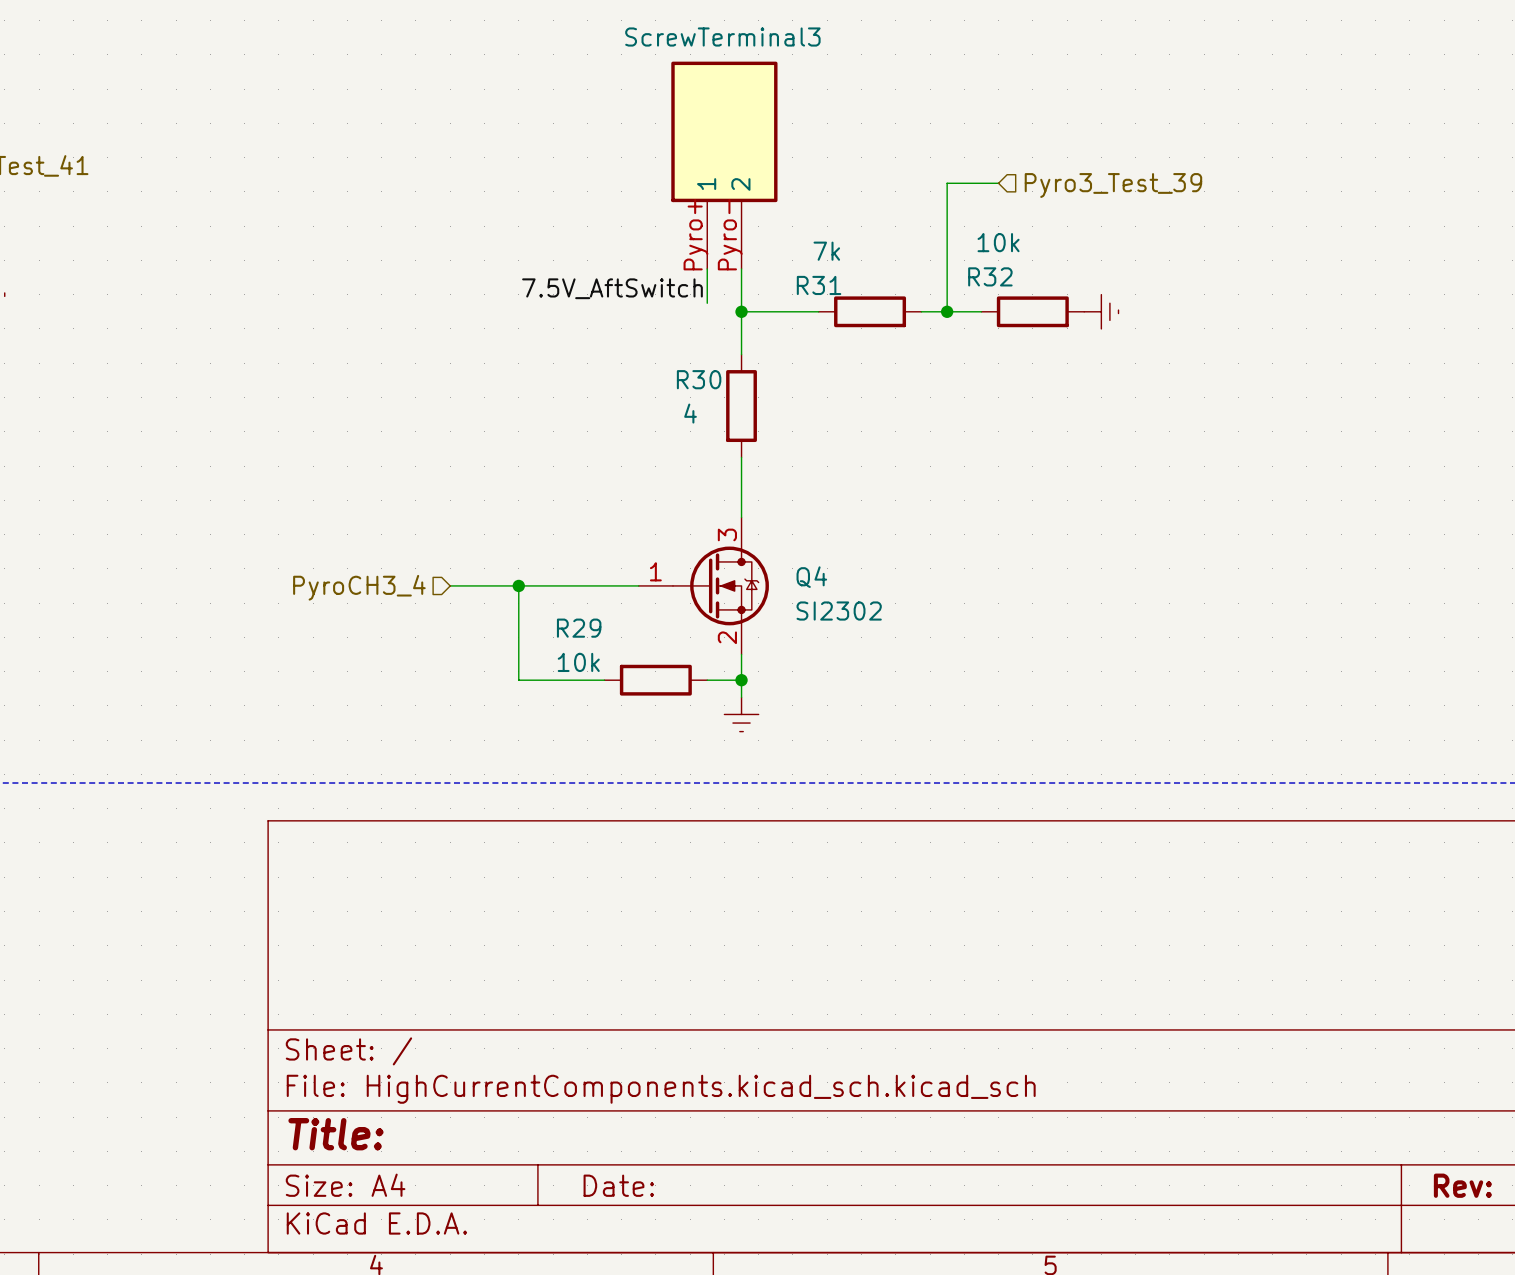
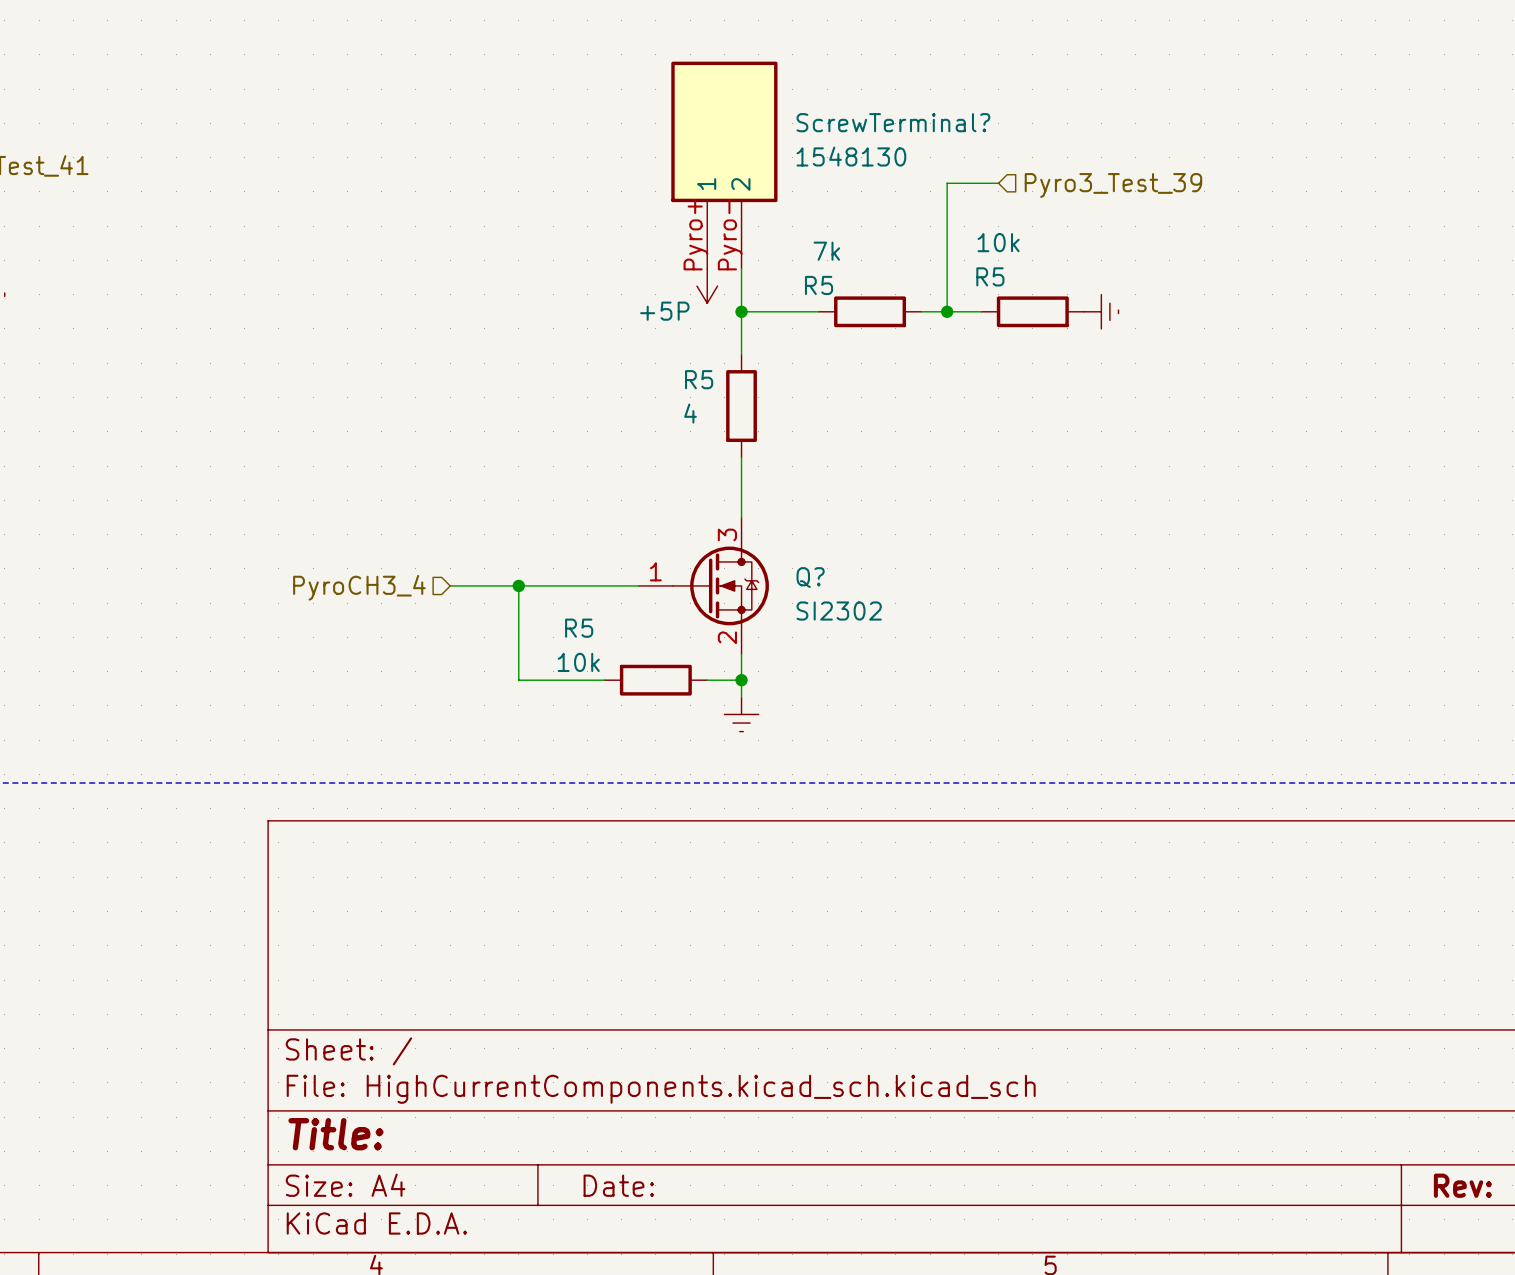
ScrewTerminal3 name: ScrewTerminal3 (722, 37) -> ScrewTerminal? (893, 122)
ScrewTerminal3 value: none -> 1548130 (851, 156)
R32 name: R32 (990, 276) -> R5 (990, 276)
R31 name: R31 (819, 285) -> R5 (819, 285)
power symbol: none -> +5P (707, 286)
label: 7.5V_AftSwitch (612, 288) -> none
R30 name: R30 (699, 379) -> R5 (699, 379)
Q4 name: Q4 (811, 577) -> Q? (810, 577)
R29 name: R29 (579, 628) -> R5 (579, 628)

